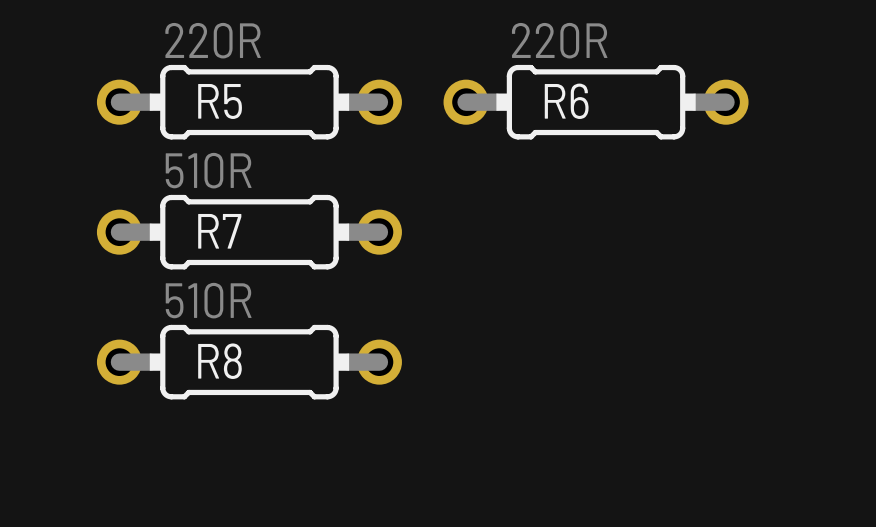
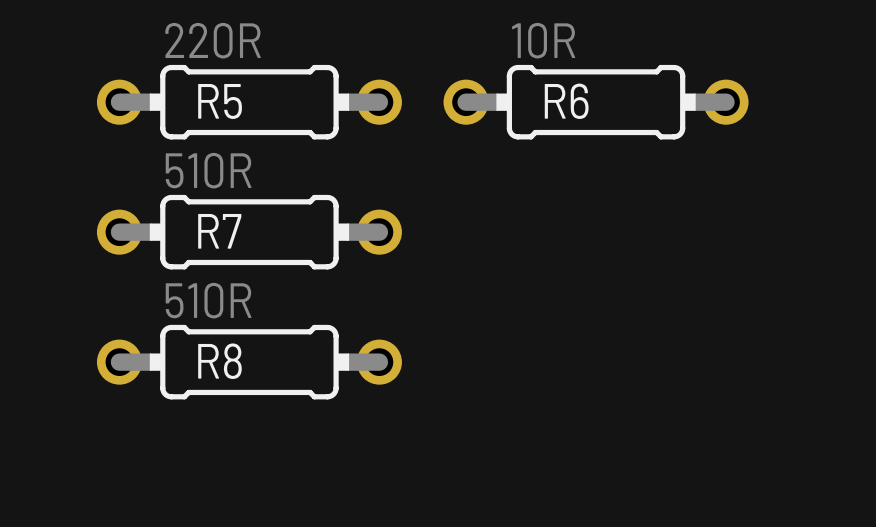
R6 value: 220R (559, 40) -> 10R (543, 40)

